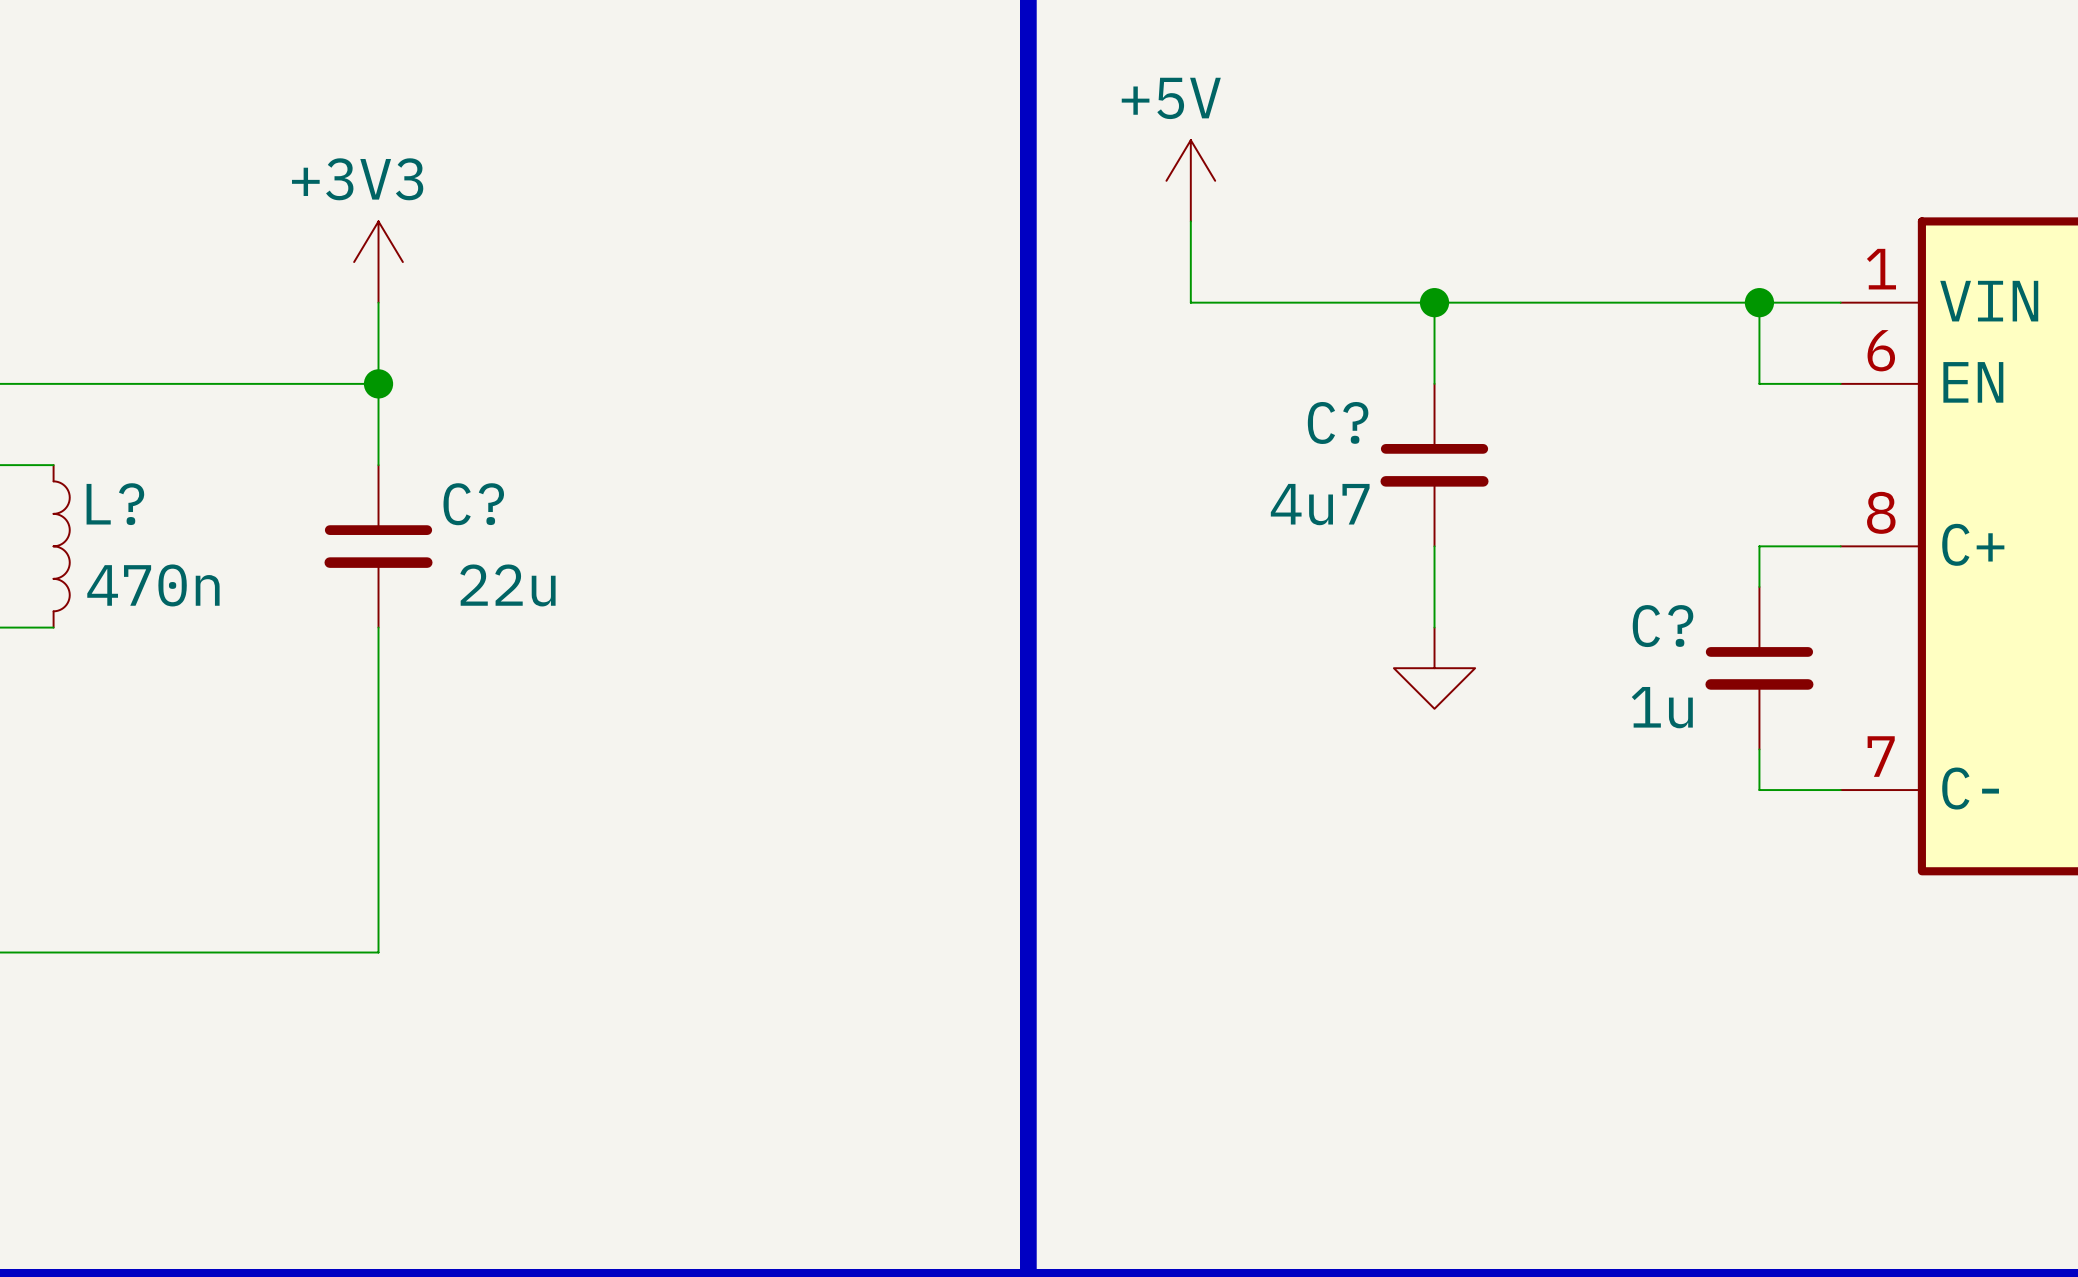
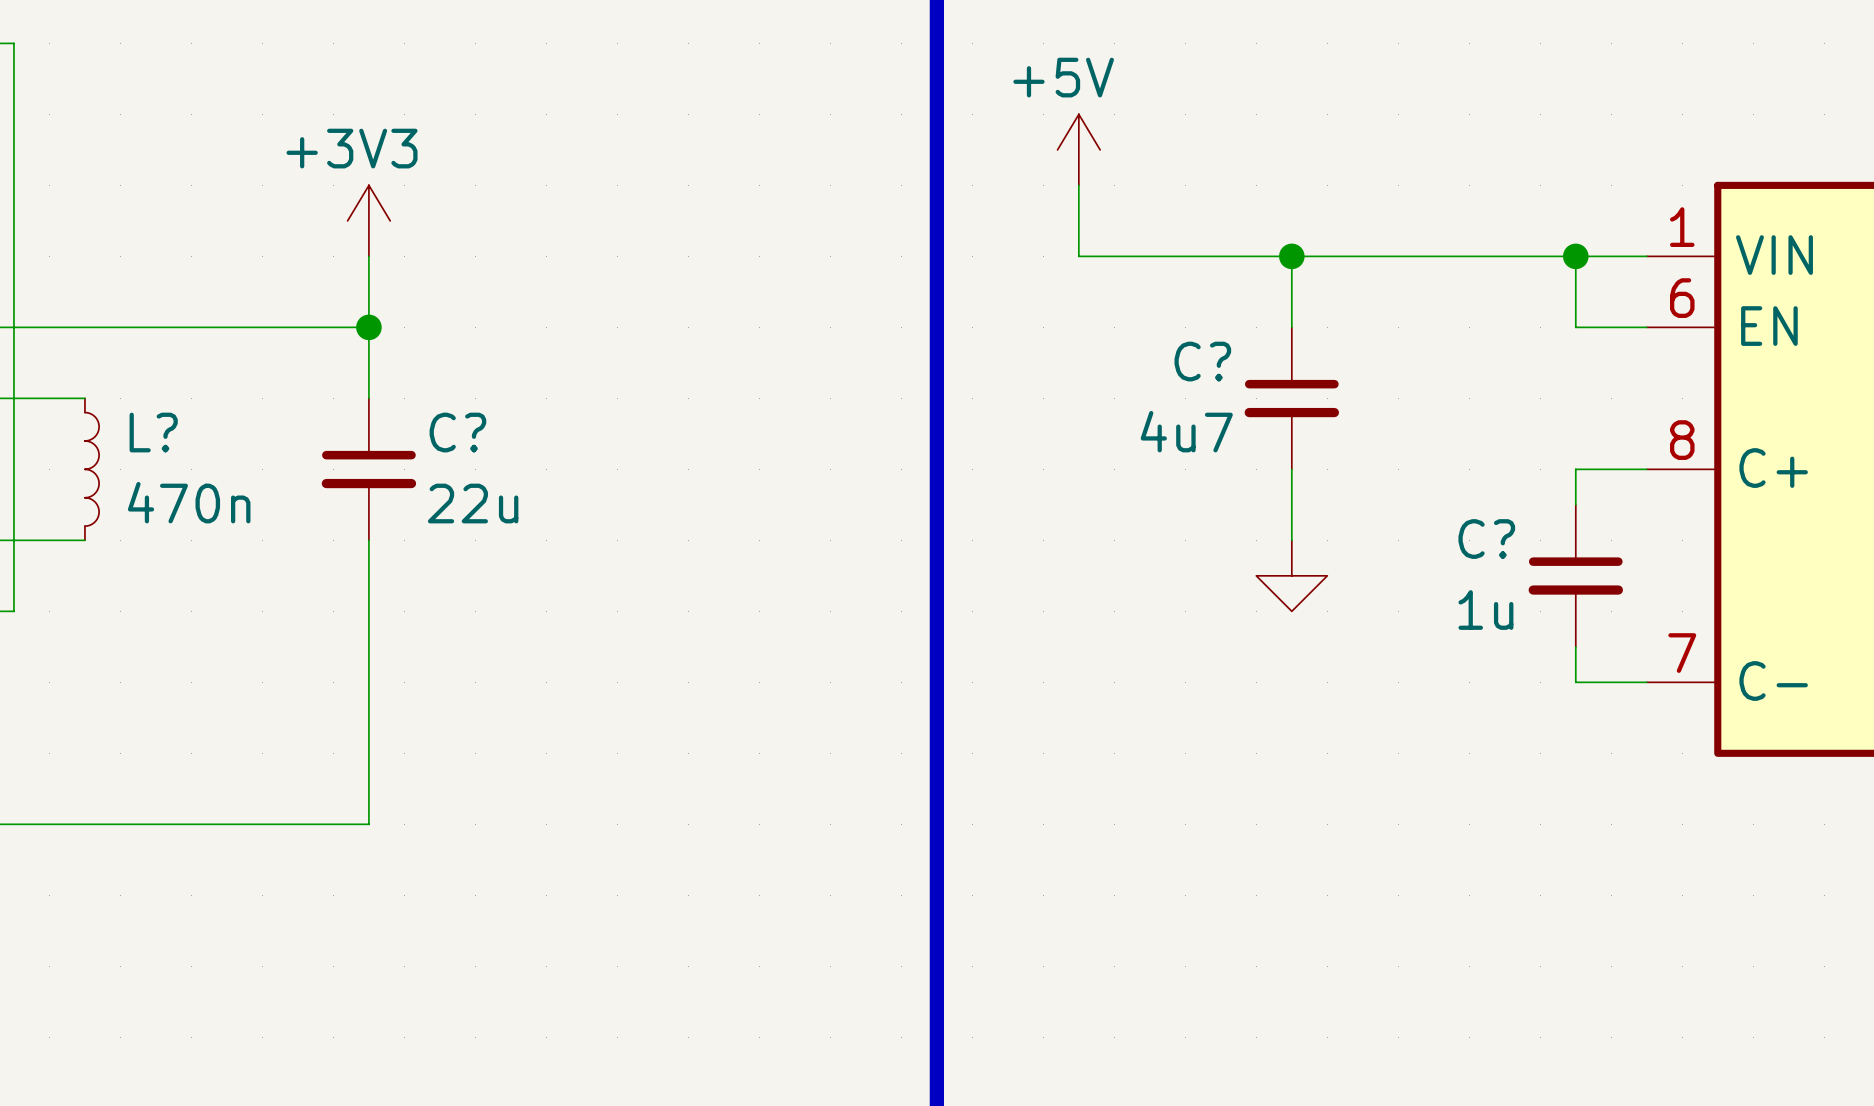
L? name position: L? (115, 504) -> L? (153, 432)
L? value position: 470n (153, 585) -> 470n (189, 502)
C? value position: 22u (507, 585) -> 22u (473, 503)

